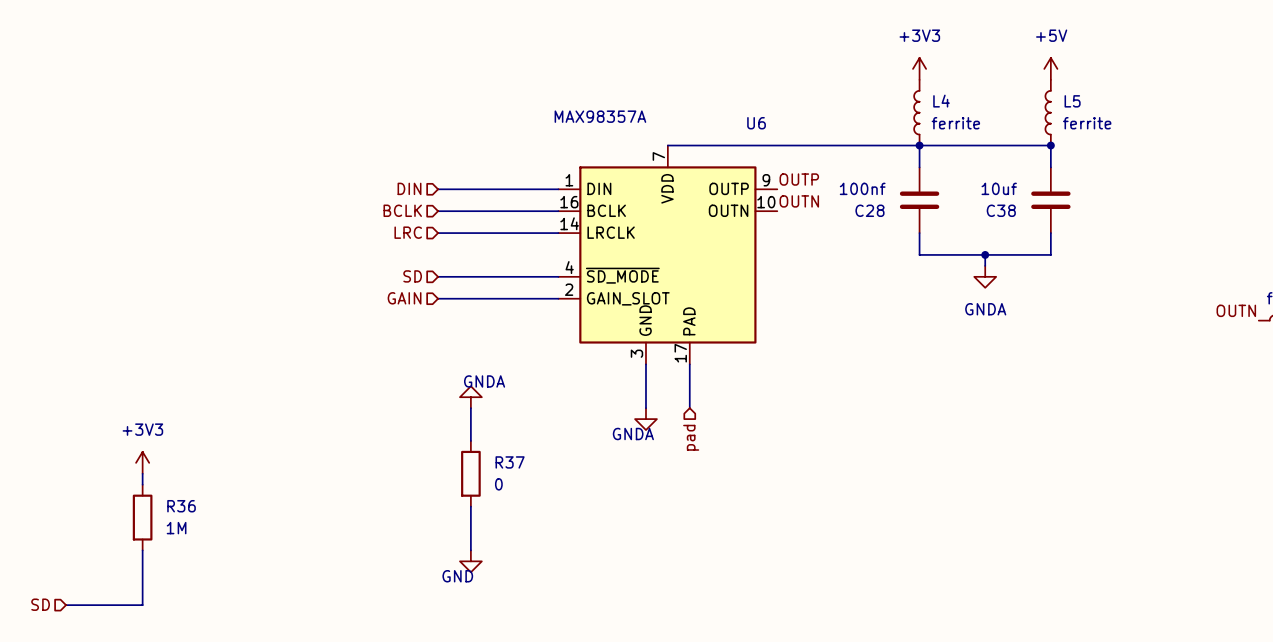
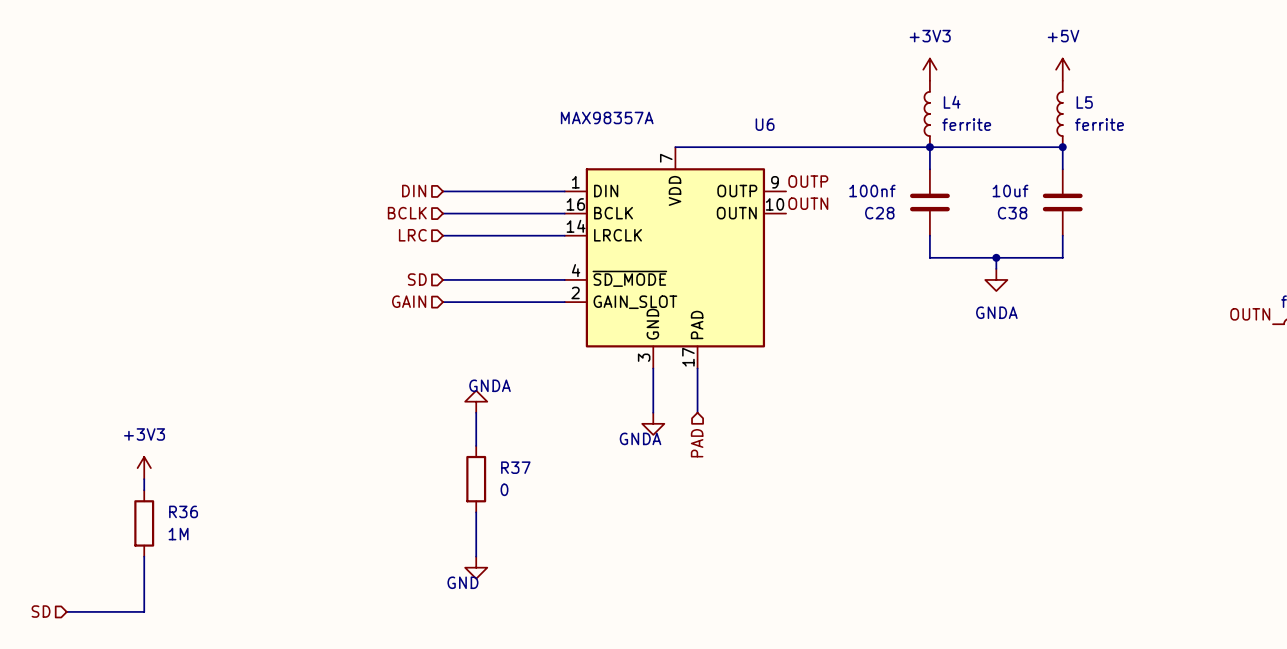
hierarchical label: pad (691, 437) -> PAD (697, 443)

